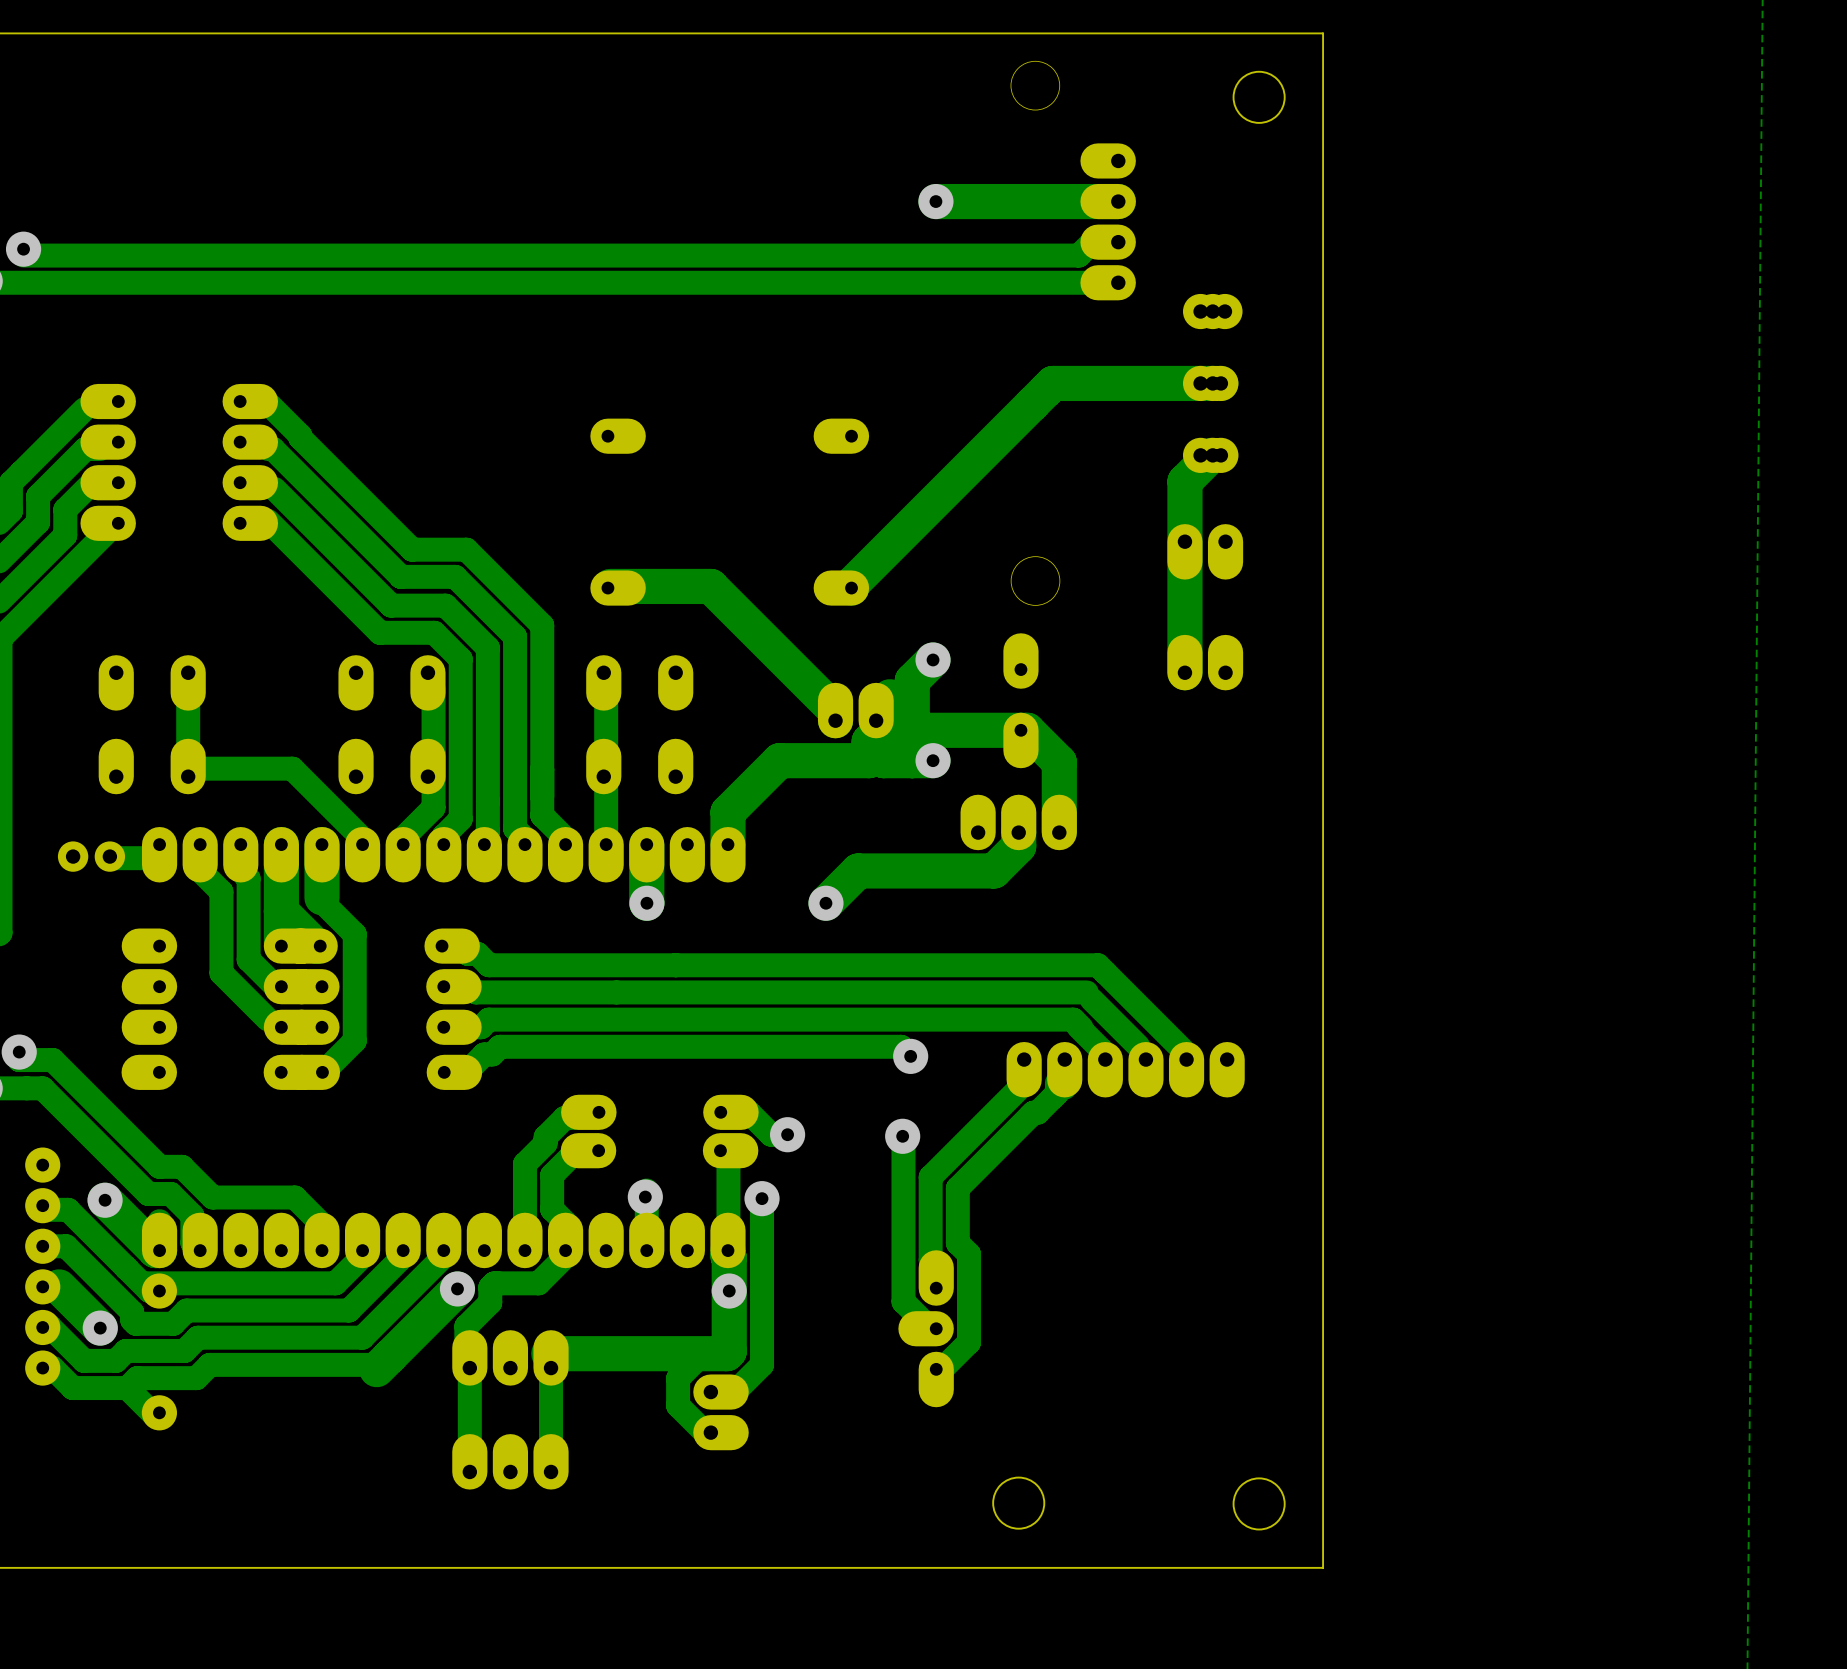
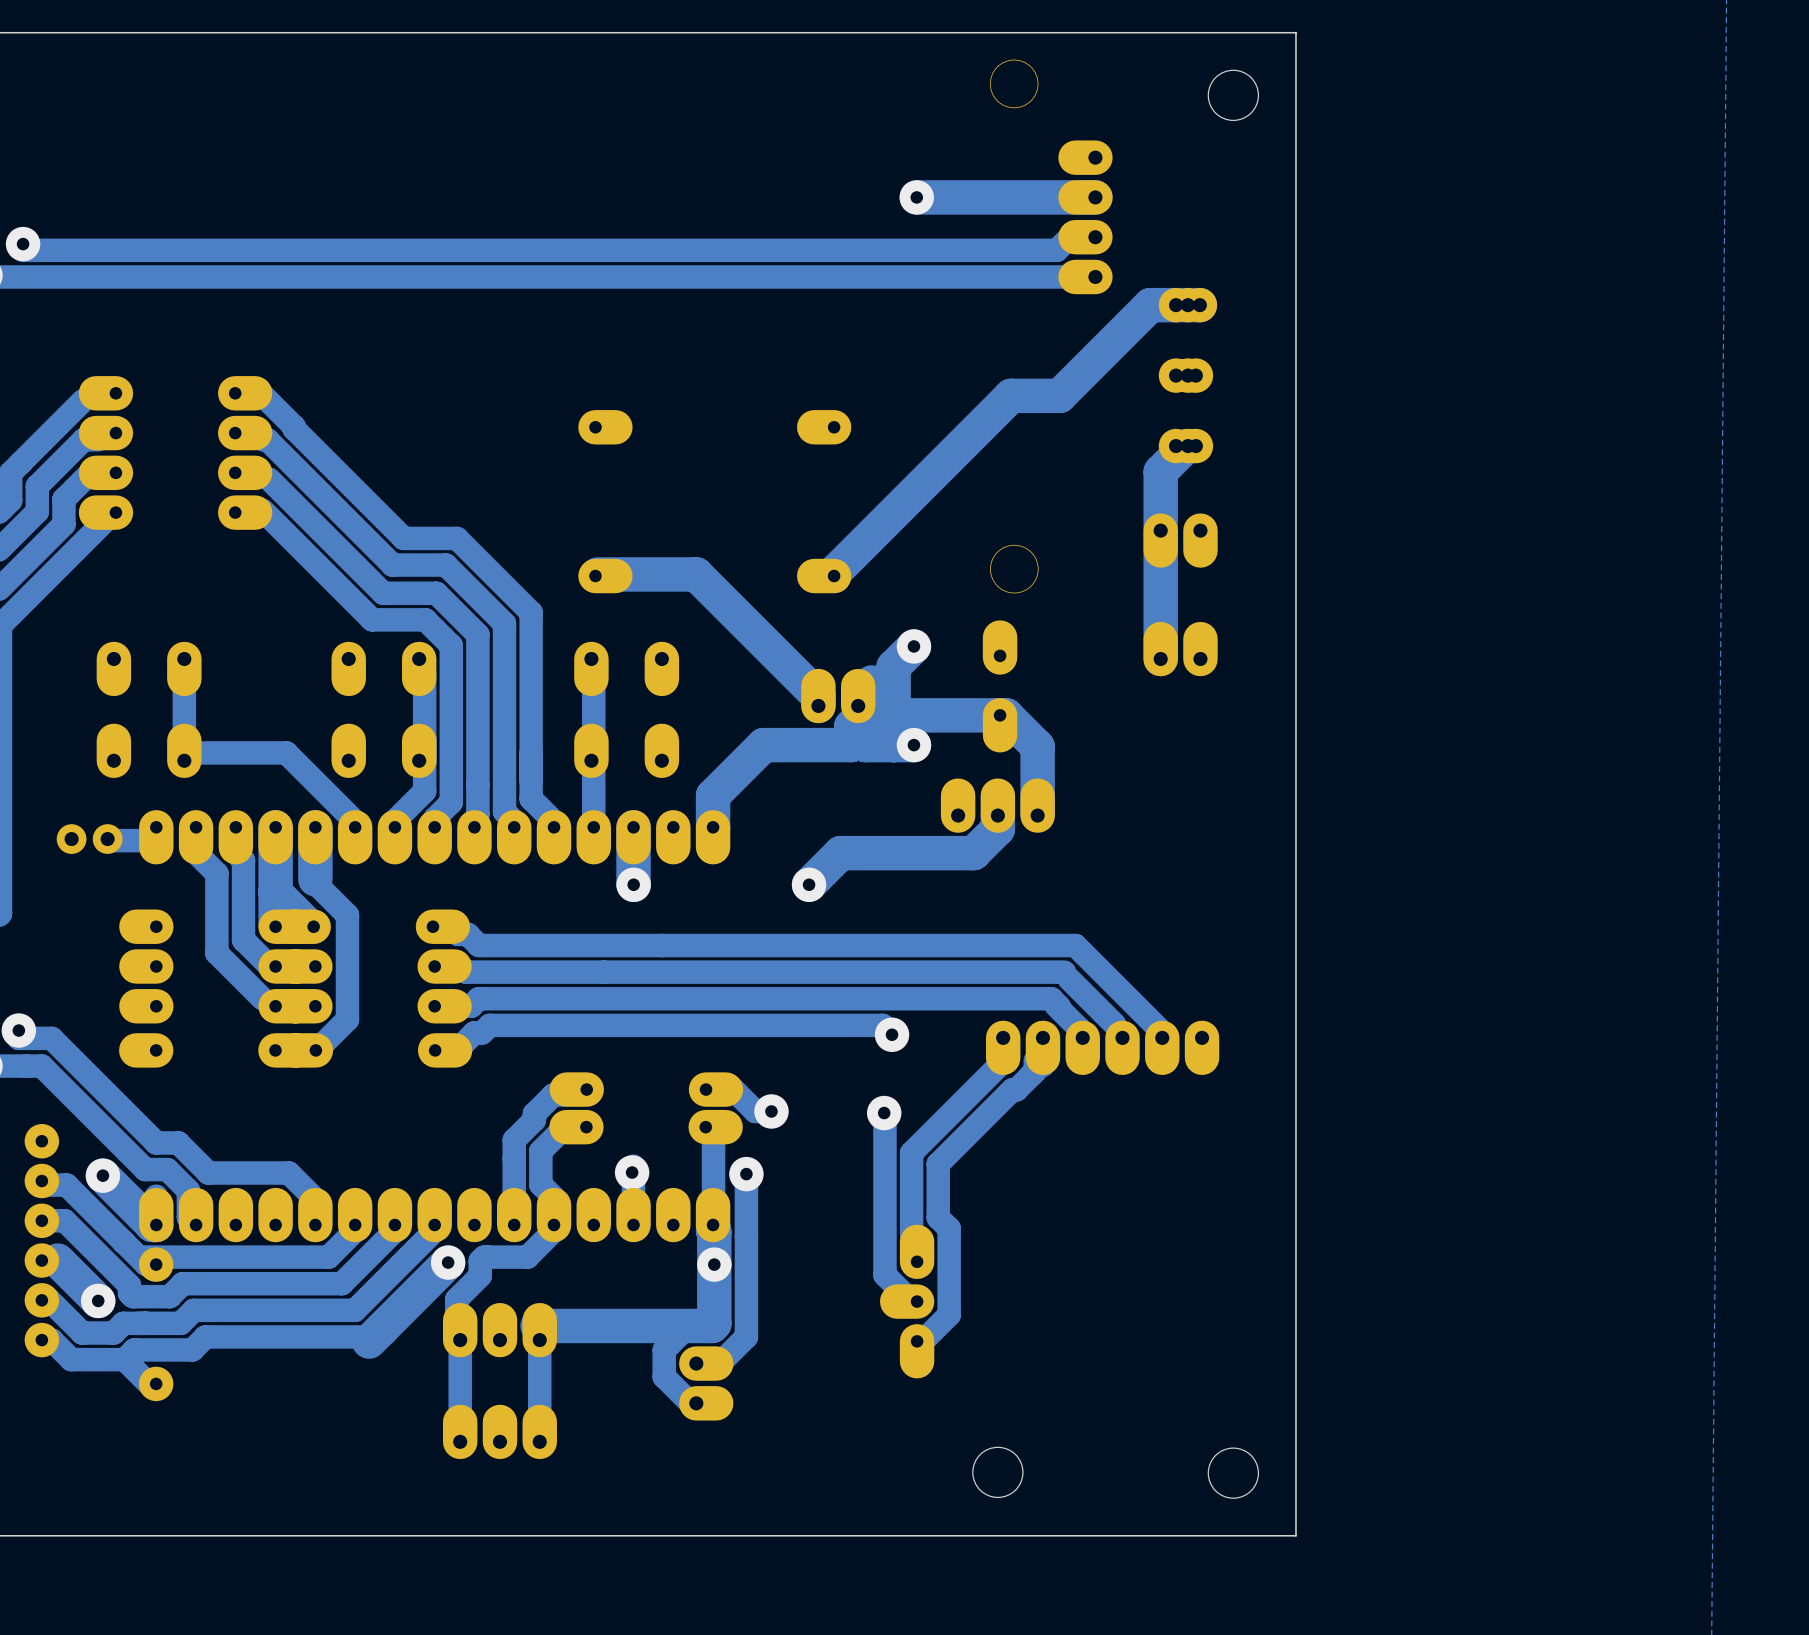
track: (1220, 383) (1052, 383) (1032, 404) -> (1199, 305) (1150, 305) (1059, 395) (1011, 395)

